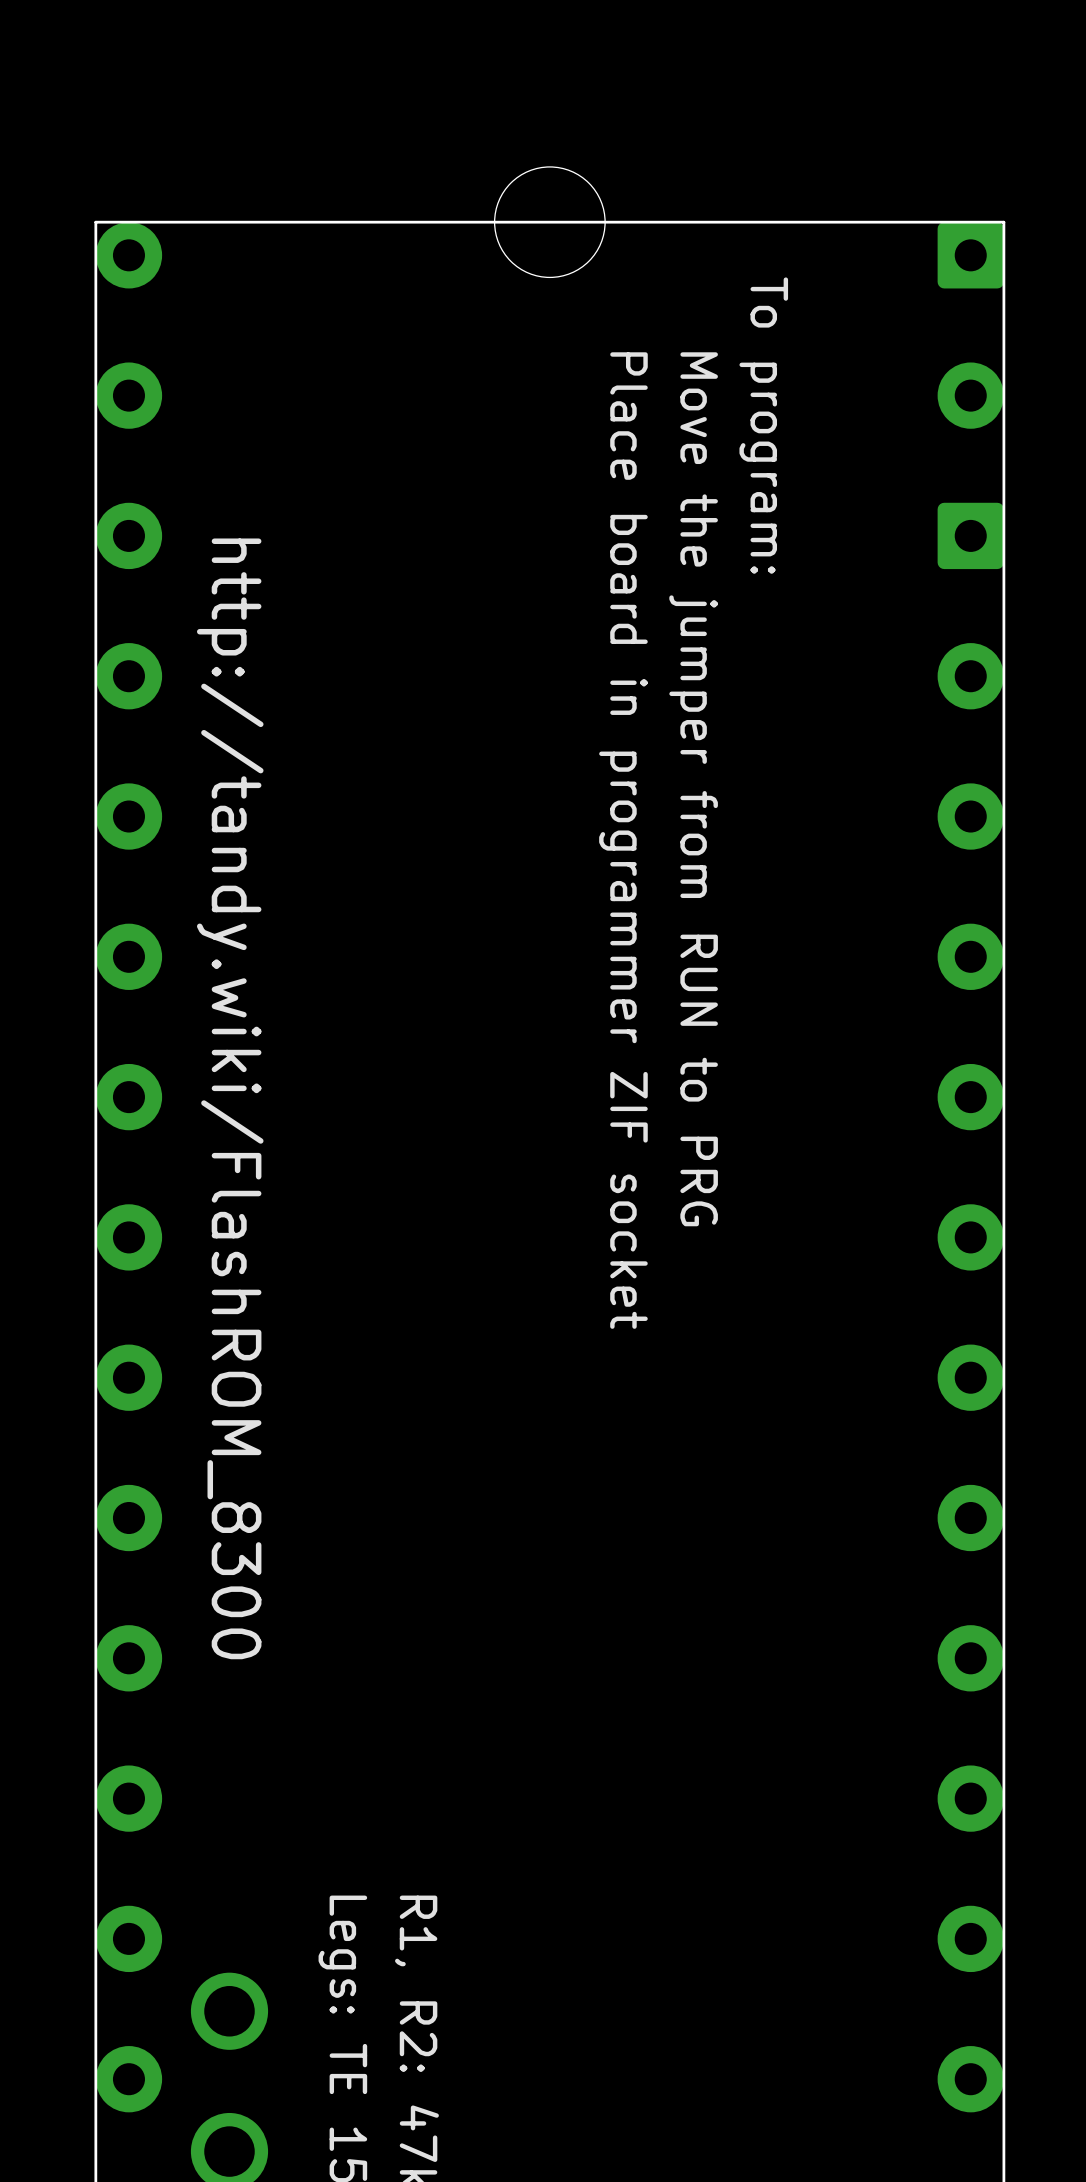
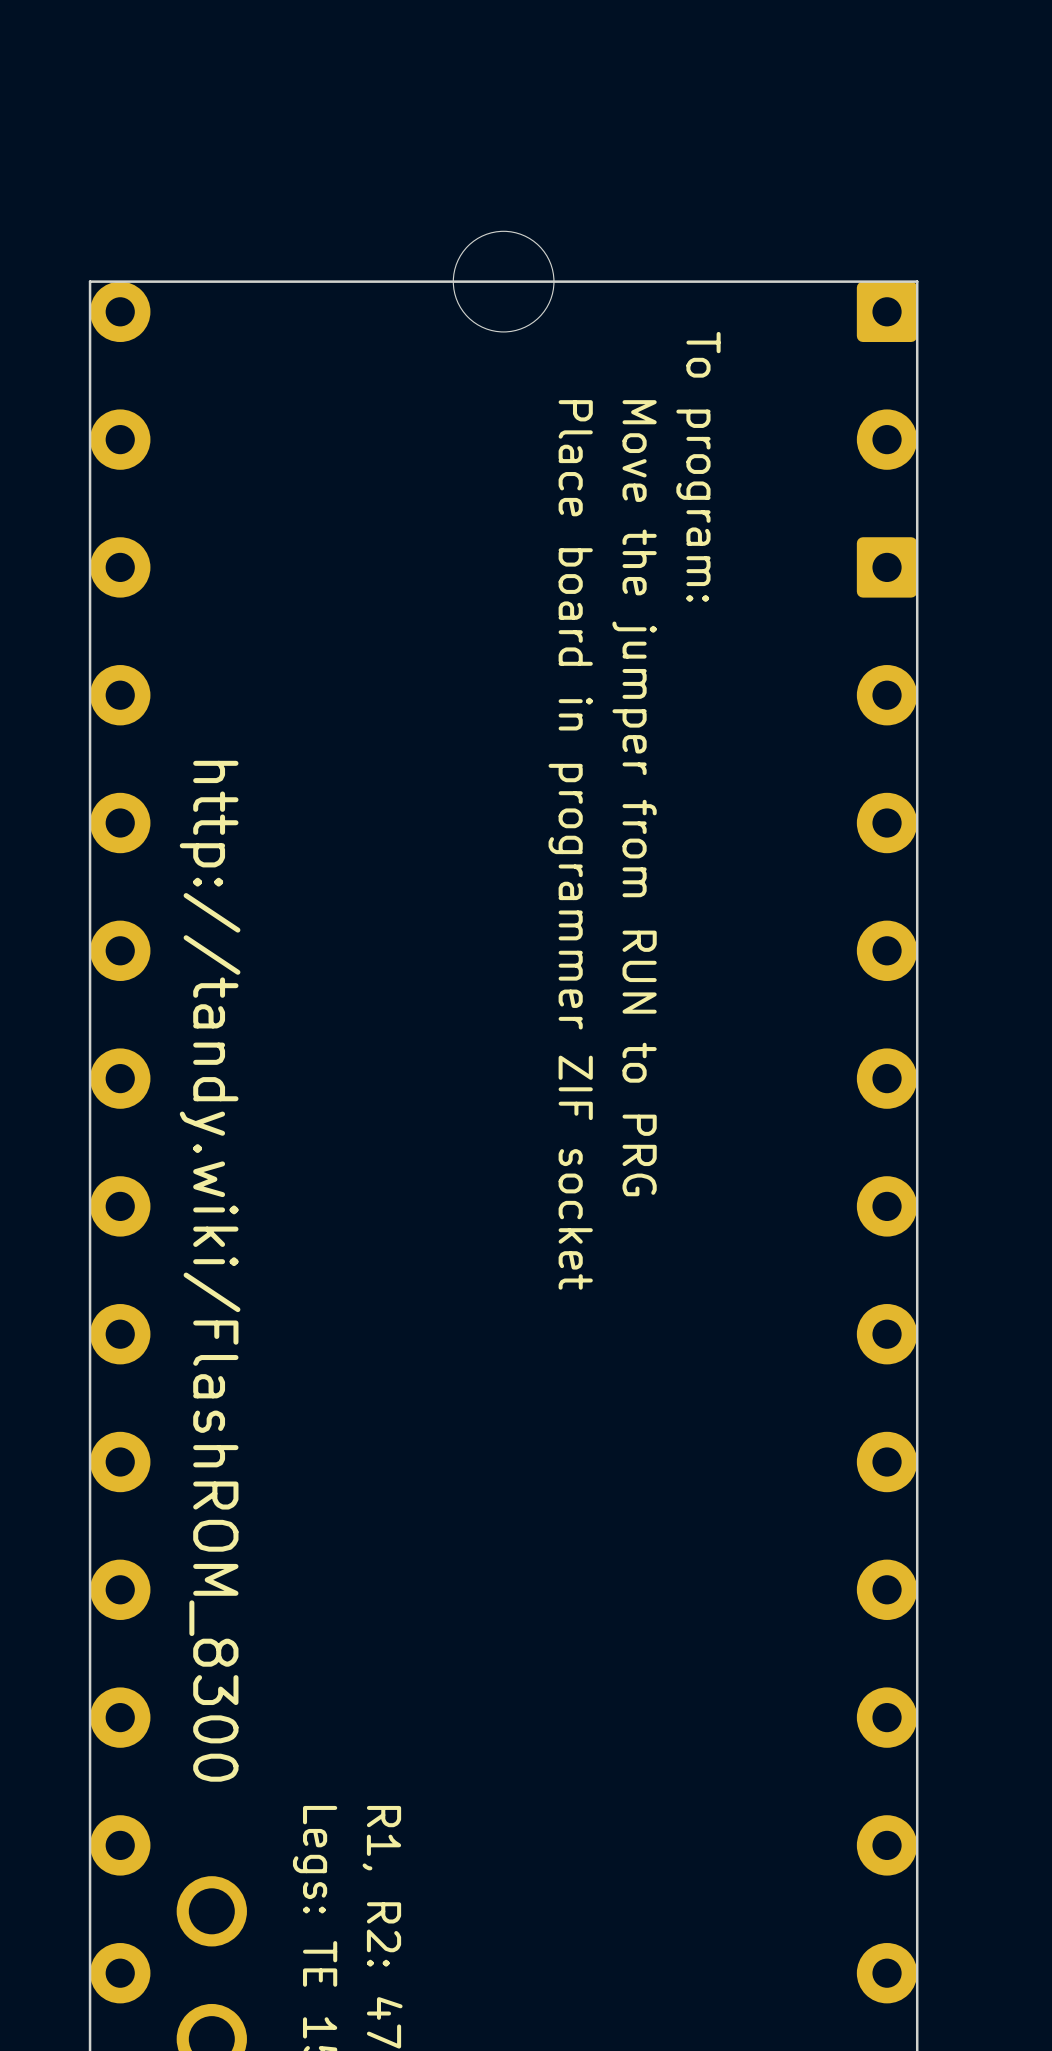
text position: http://tandy.wiki/FlashROM_8300 (230, 1098) -> http://tandy.wiki/FlashROM_8300 (210, 1271)

